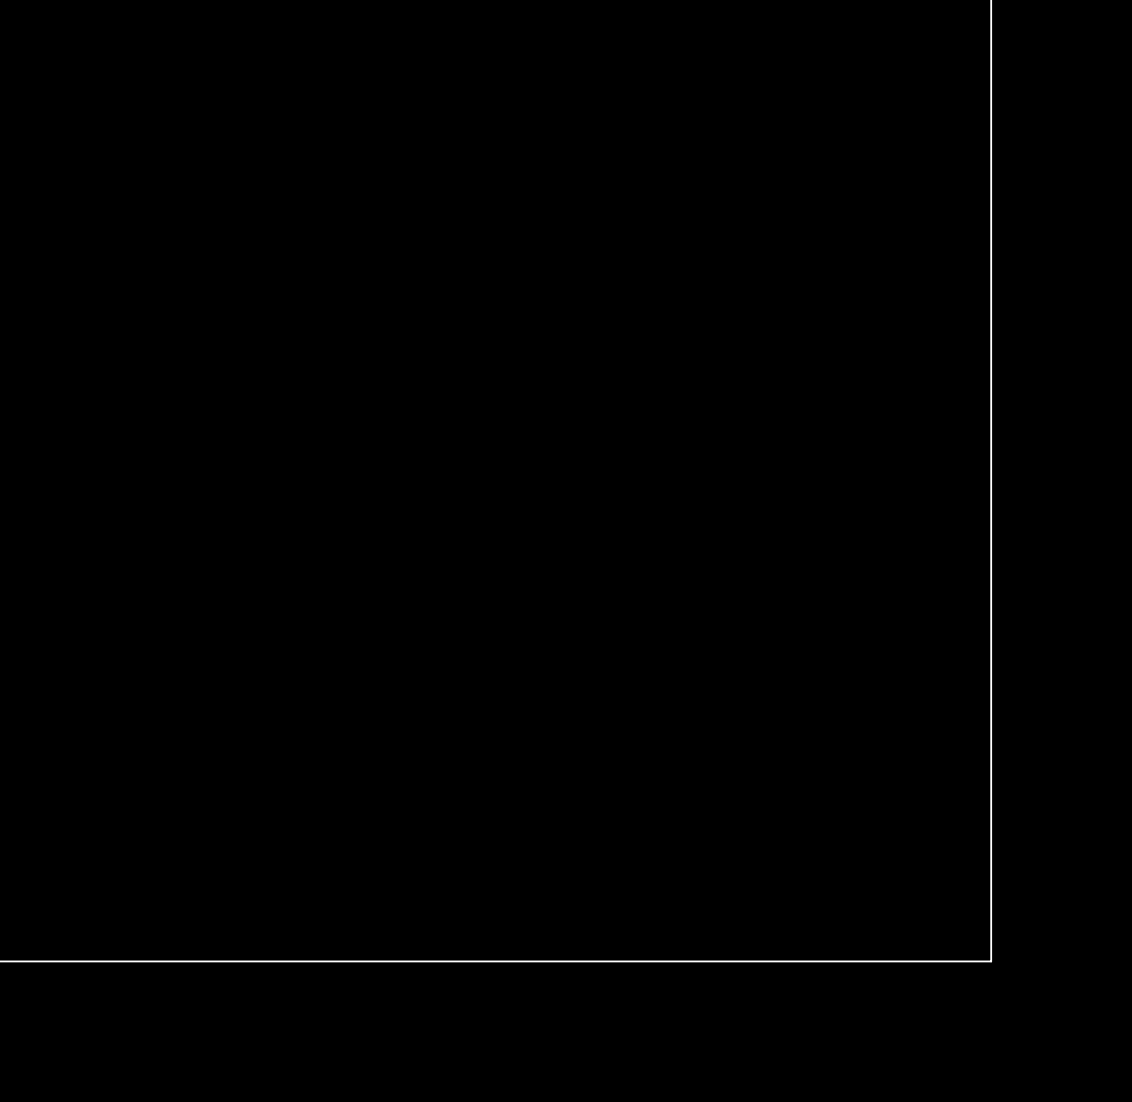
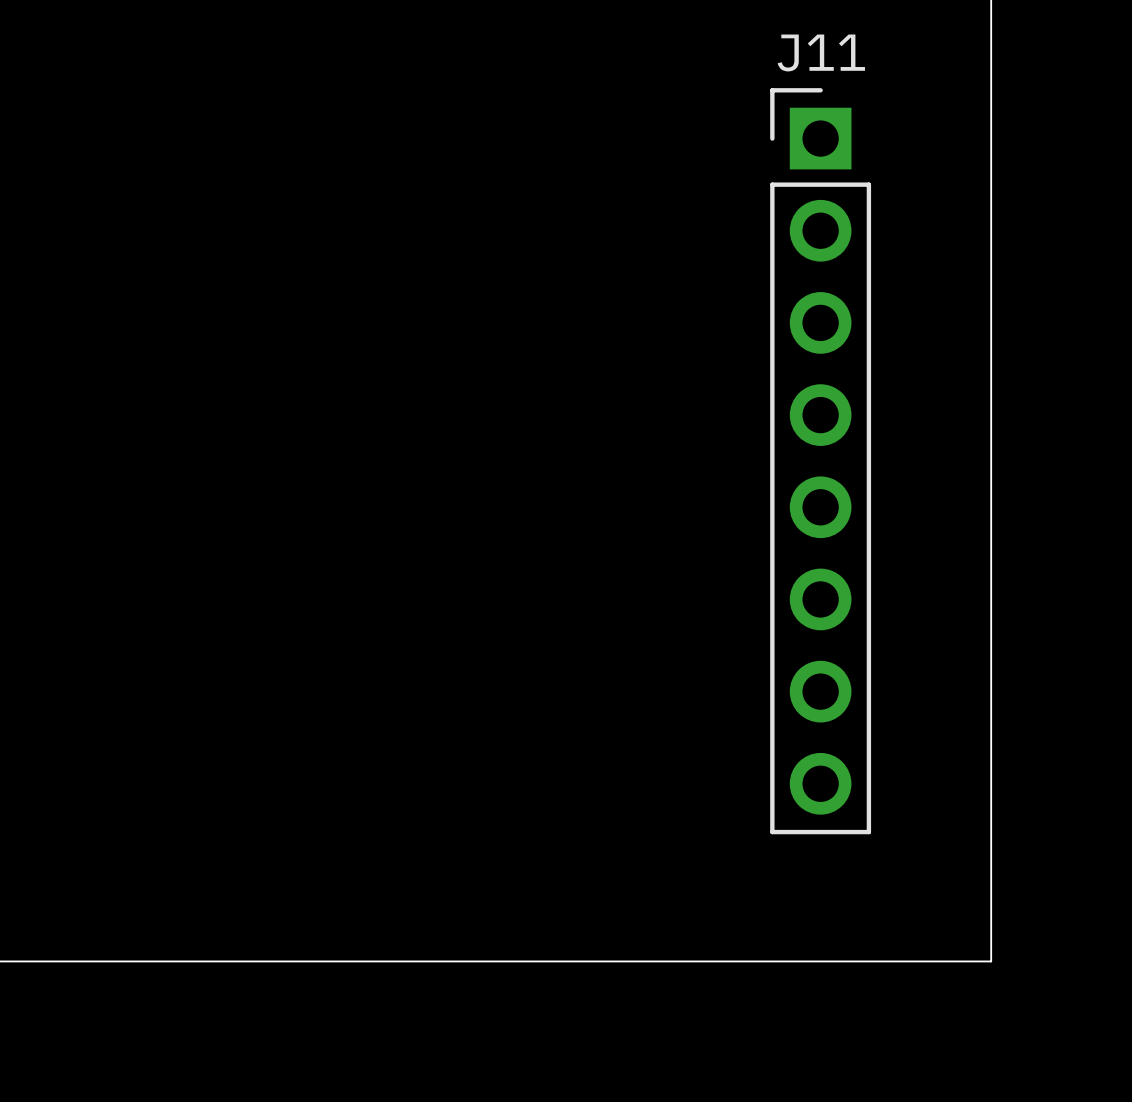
J11: none -> (820, 461)

